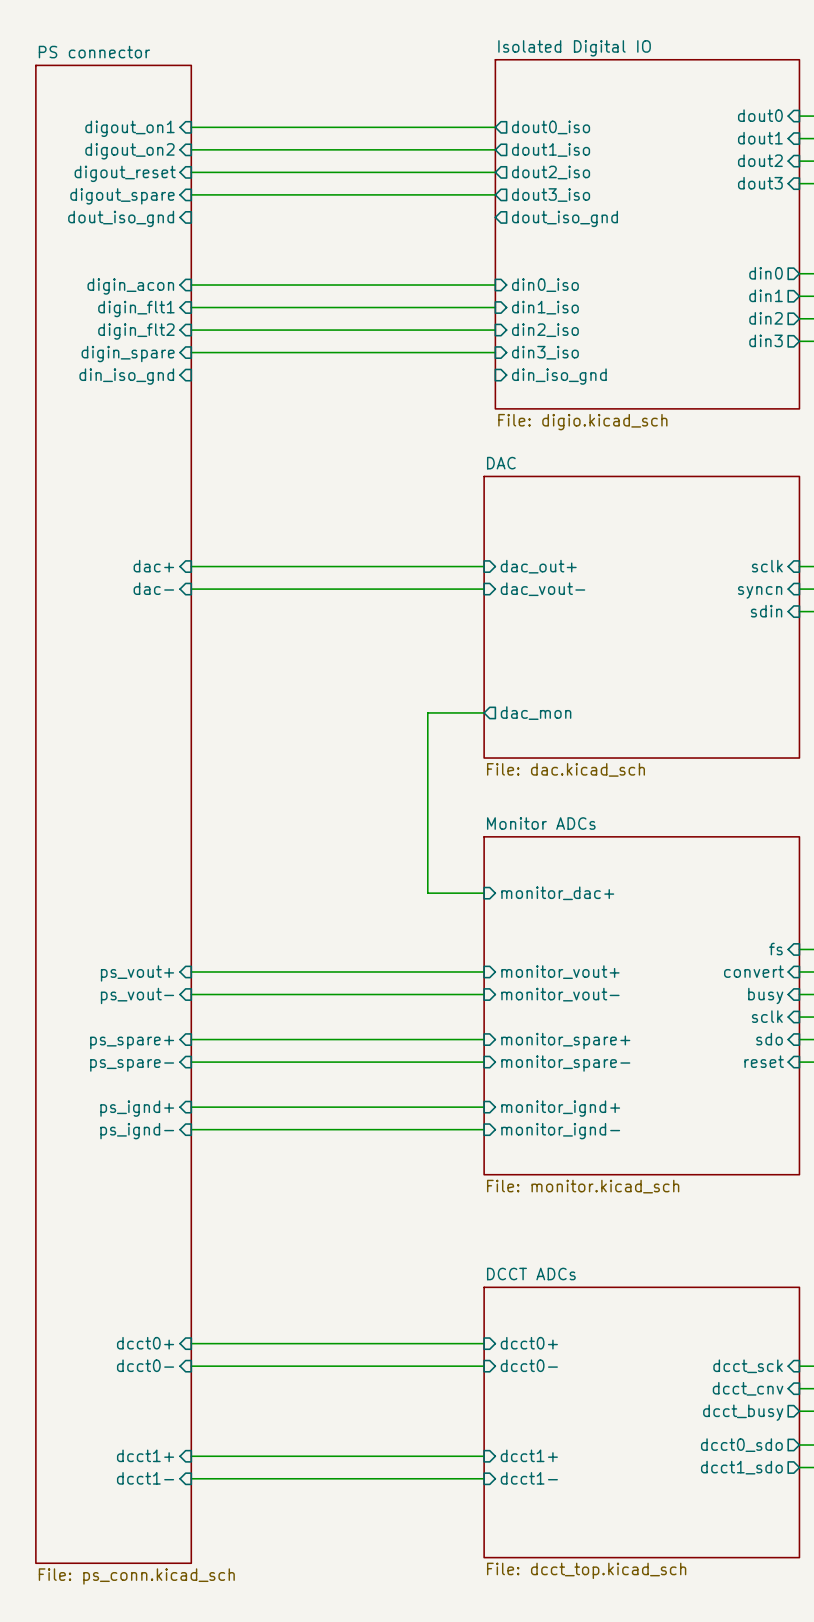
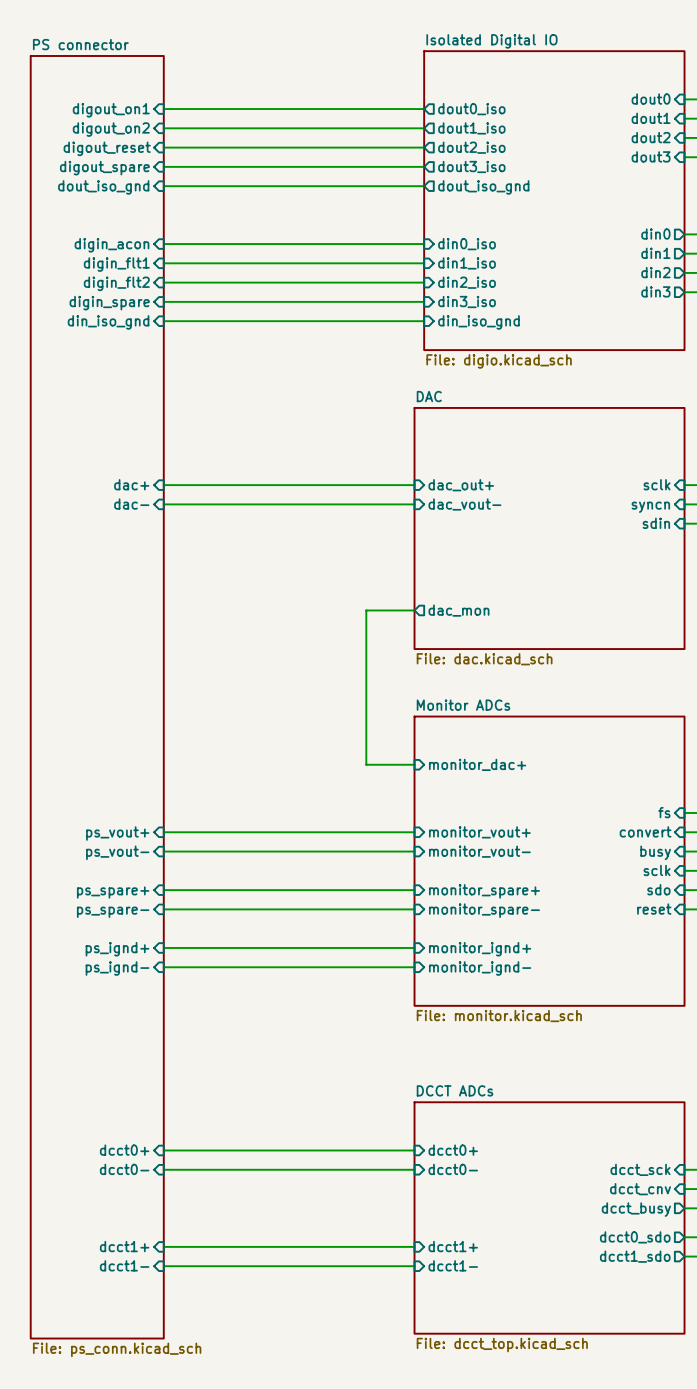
wire: none -> (163, 186) (424, 186)
wire: none -> (163, 321) (424, 321)

